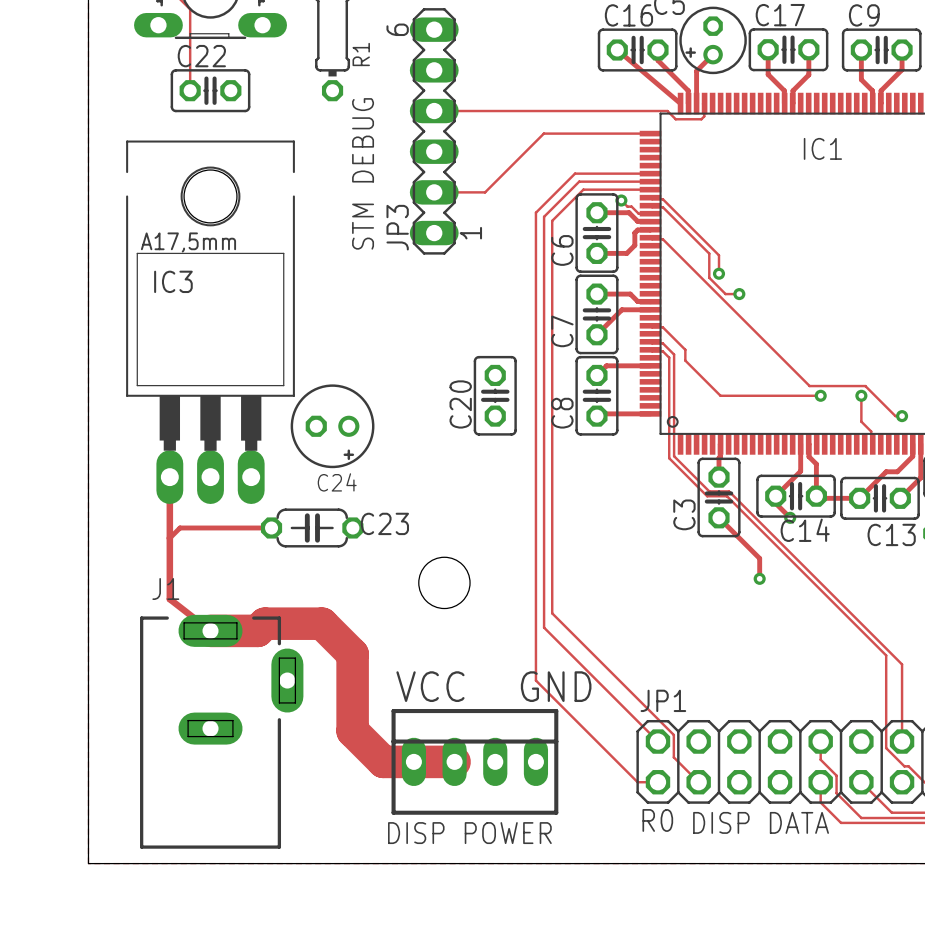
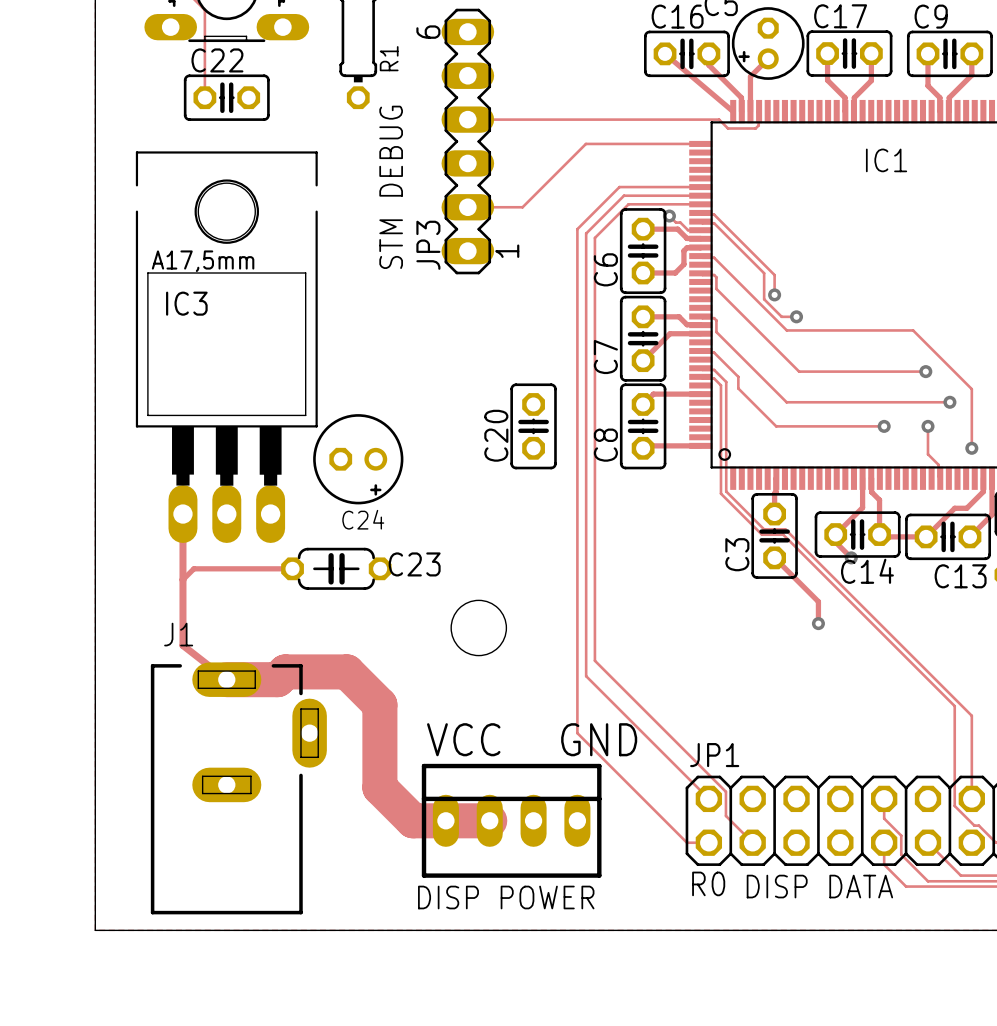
track: none -> (700, 273) (714, 275) (716, 277) (716, 288) (799, 371) (925, 371)
track: none -> (700, 316) (714, 318) (716, 320) (716, 332) (786, 402) (949, 402)
track: (730, 306) (809, 386) (865, 386) (895, 416) (902, 416) -> (786, 330) (913, 330) (971, 389) (971, 448)
via: none -> (925, 371)
via: none -> (949, 402)

